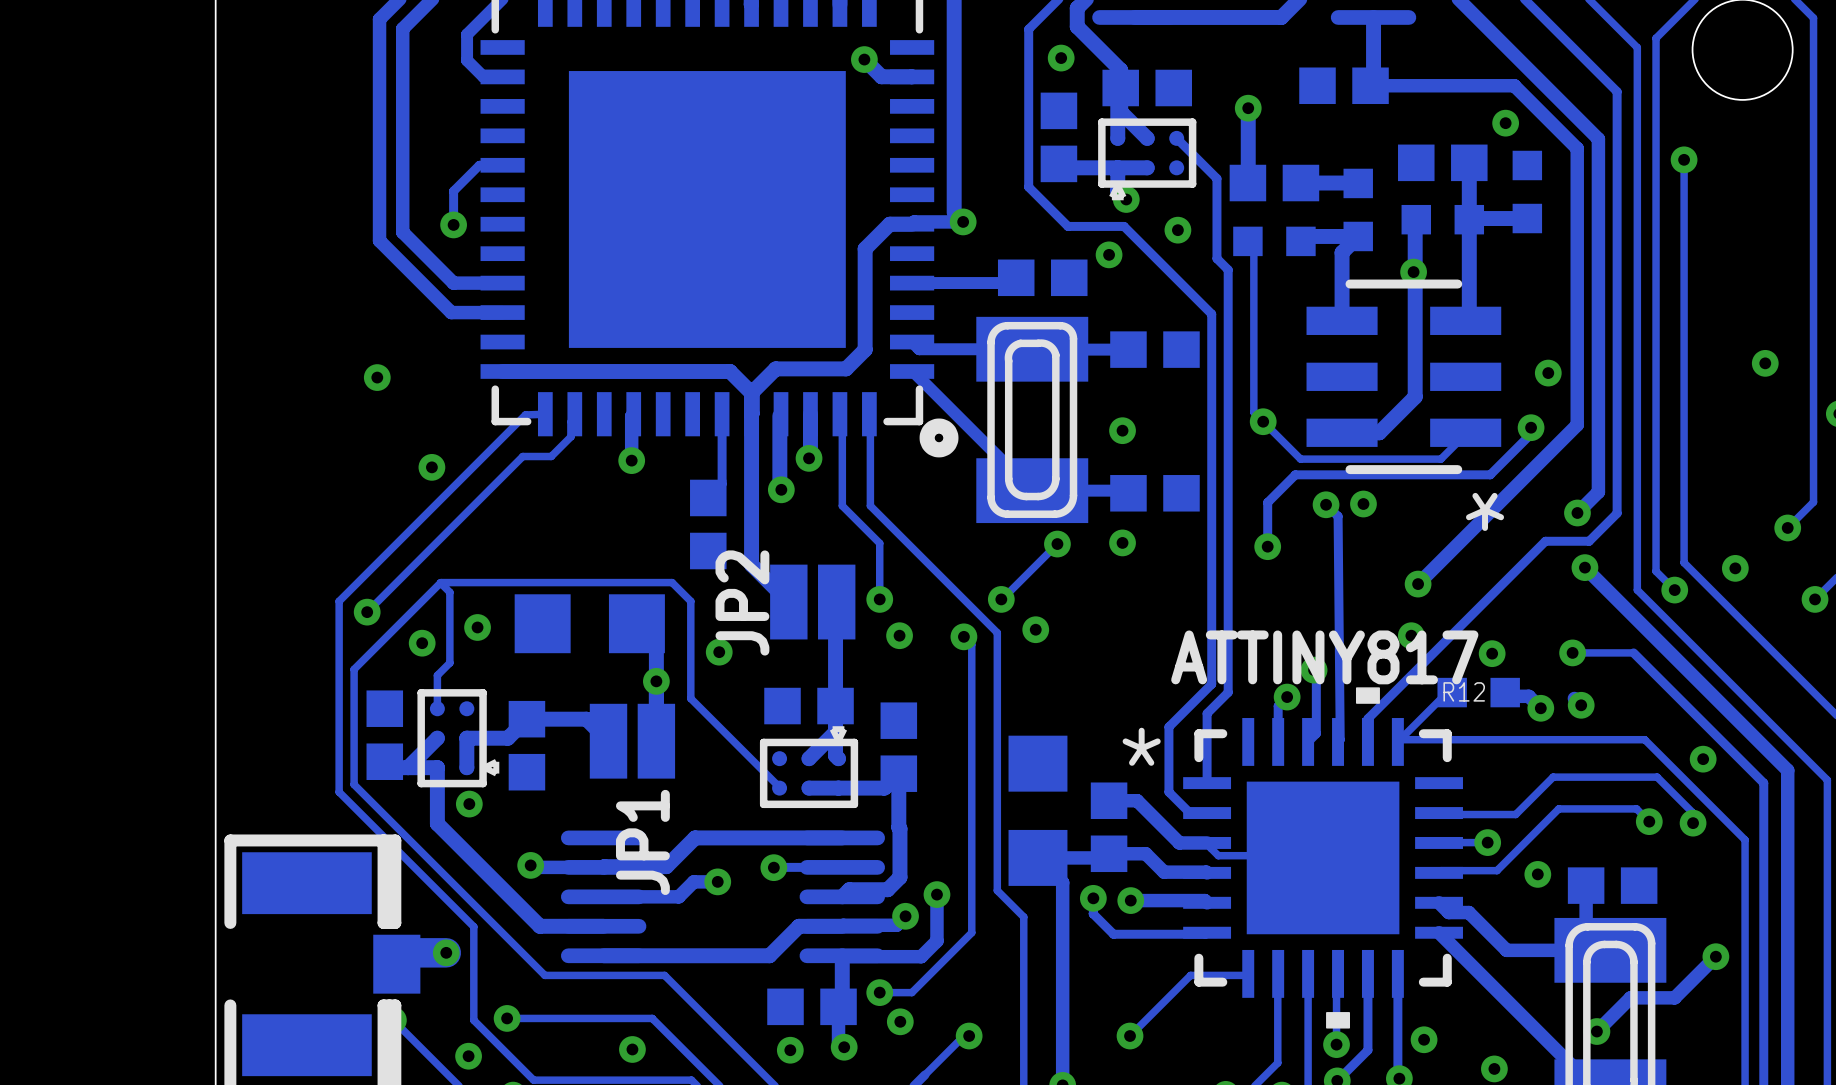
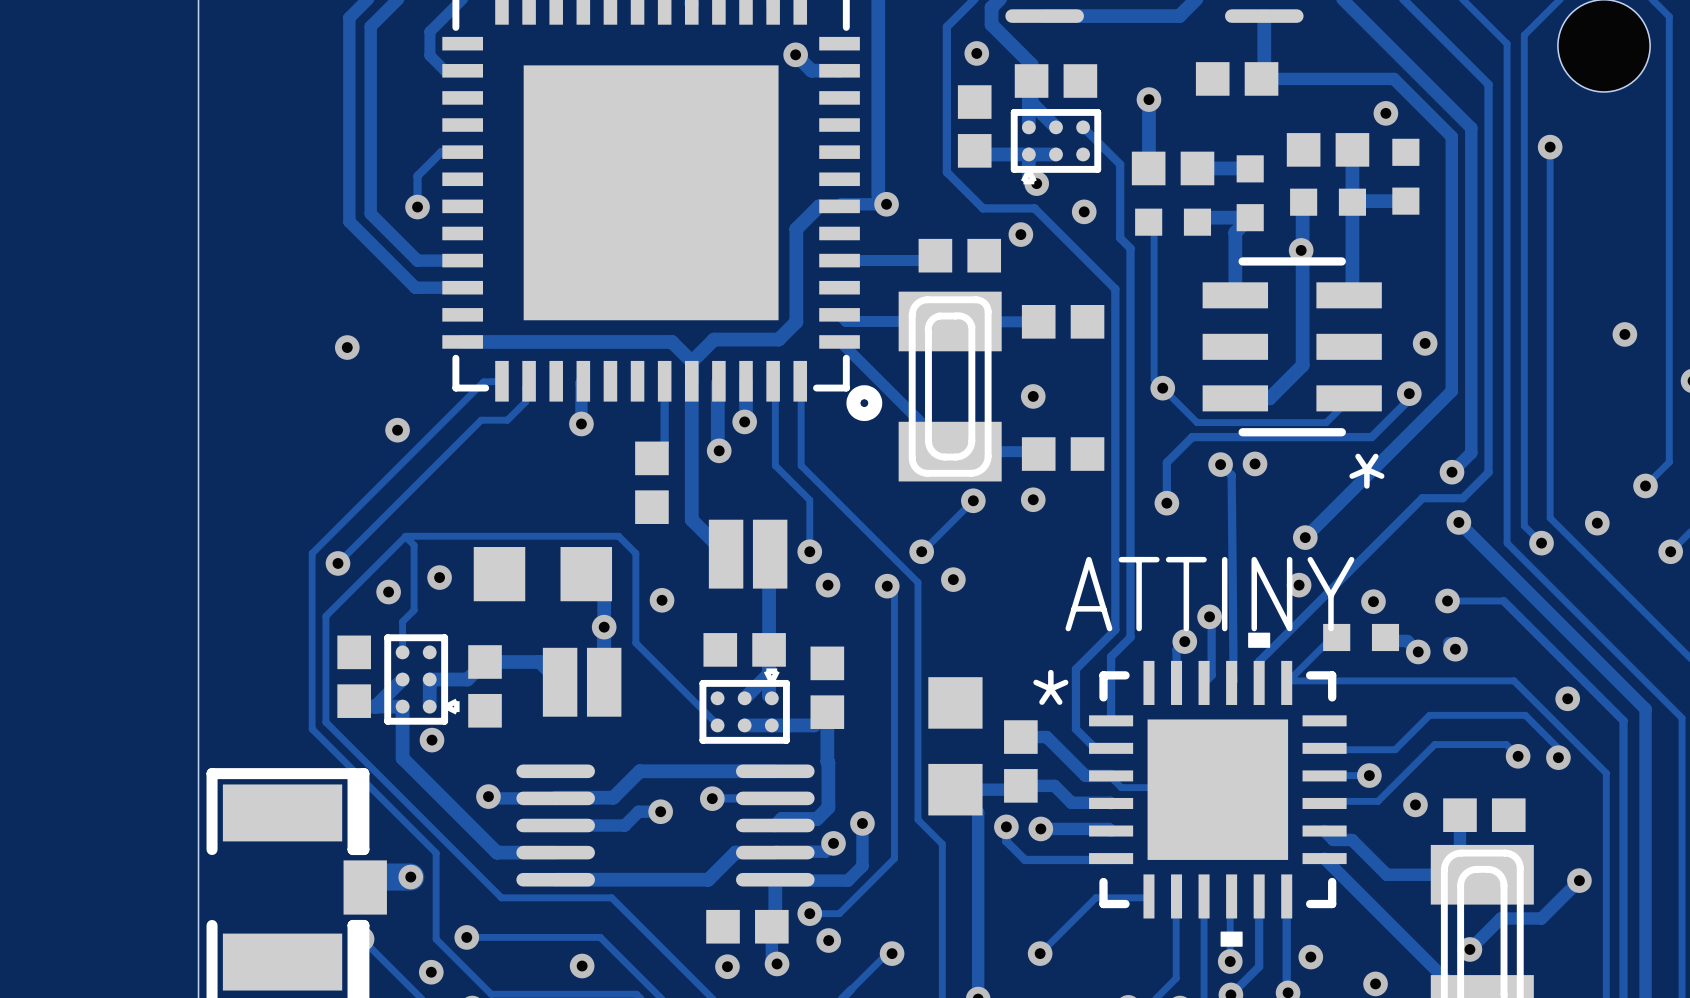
JP2 name: JP2 (742, 603) -> none
text: ATTINY817 (1324, 657) -> ATTINY (1209, 594)
R12 name: R12 (1464, 691) -> none
JP1 name: JP1 (642, 842) -> none

